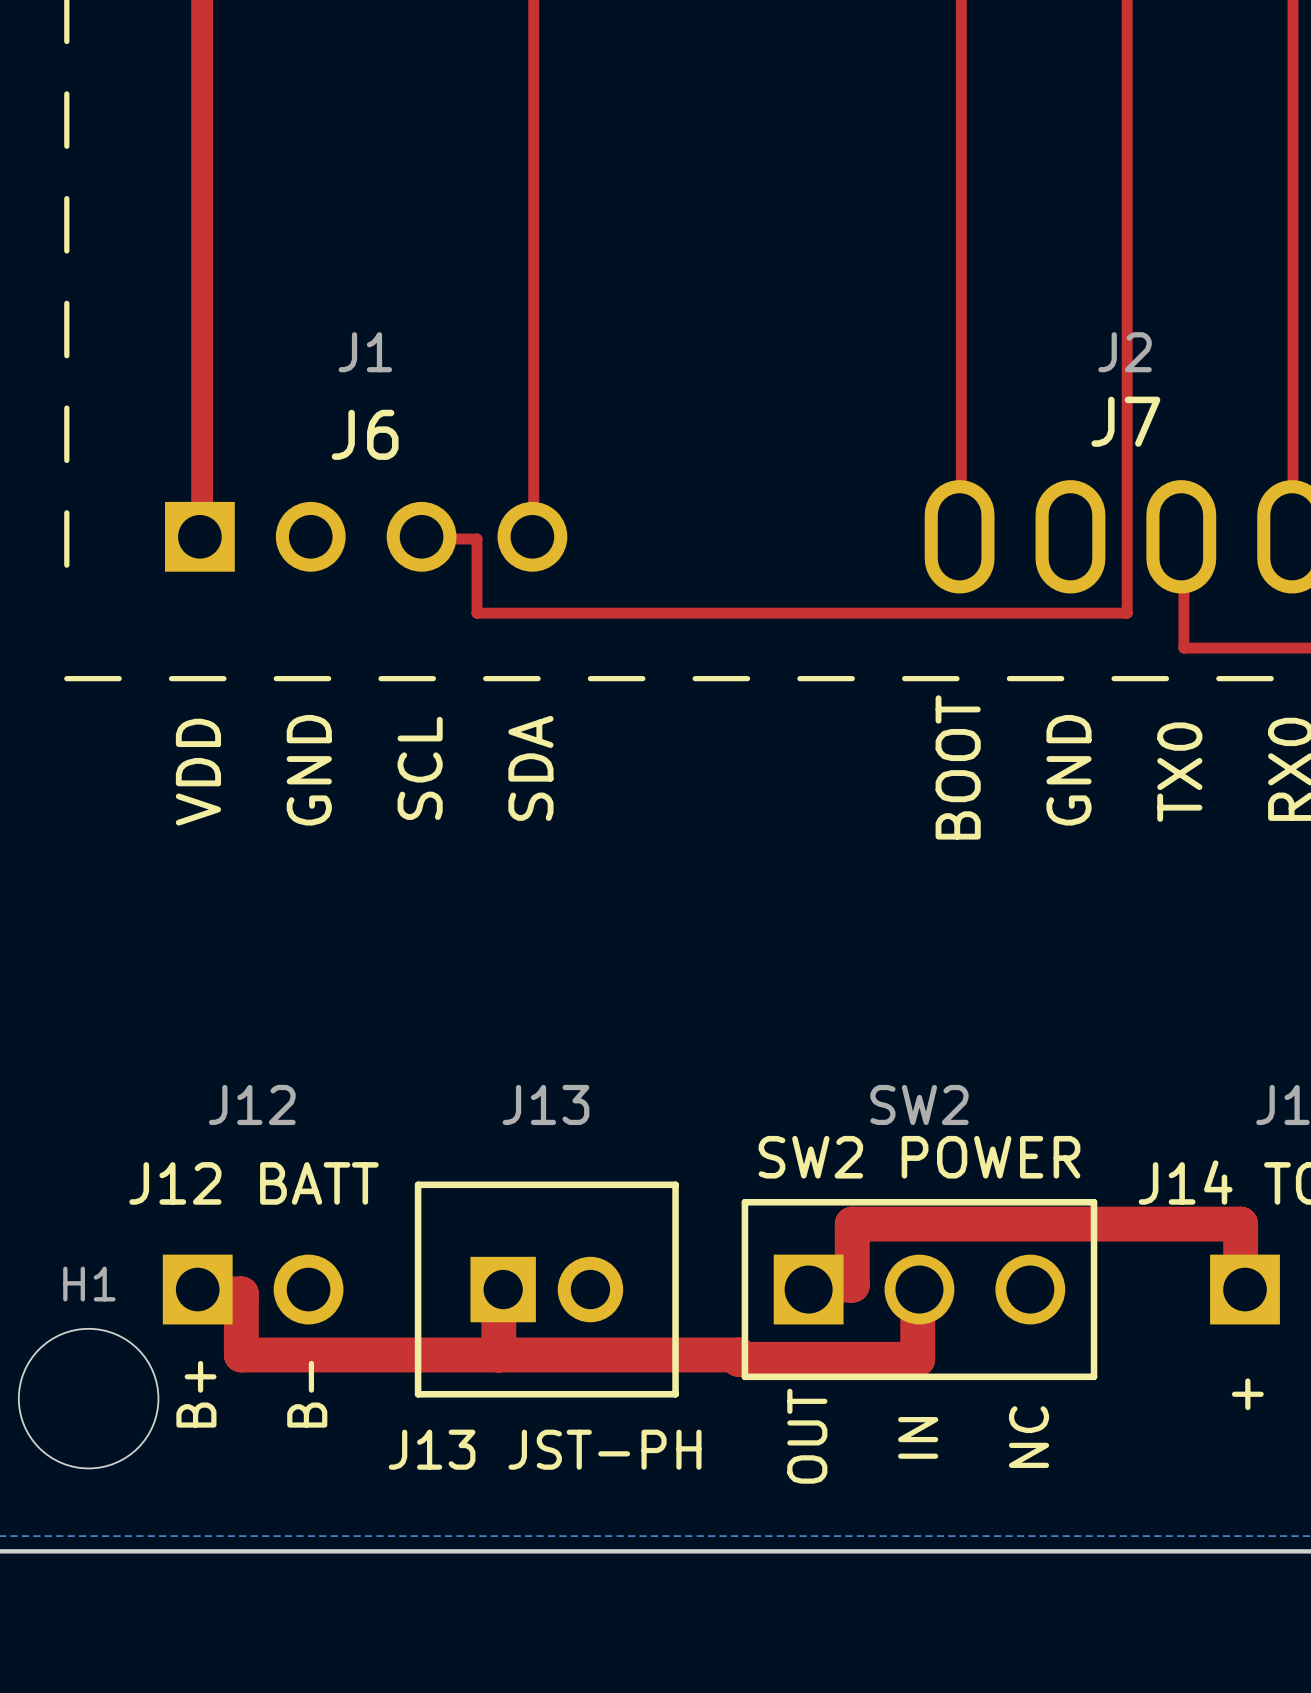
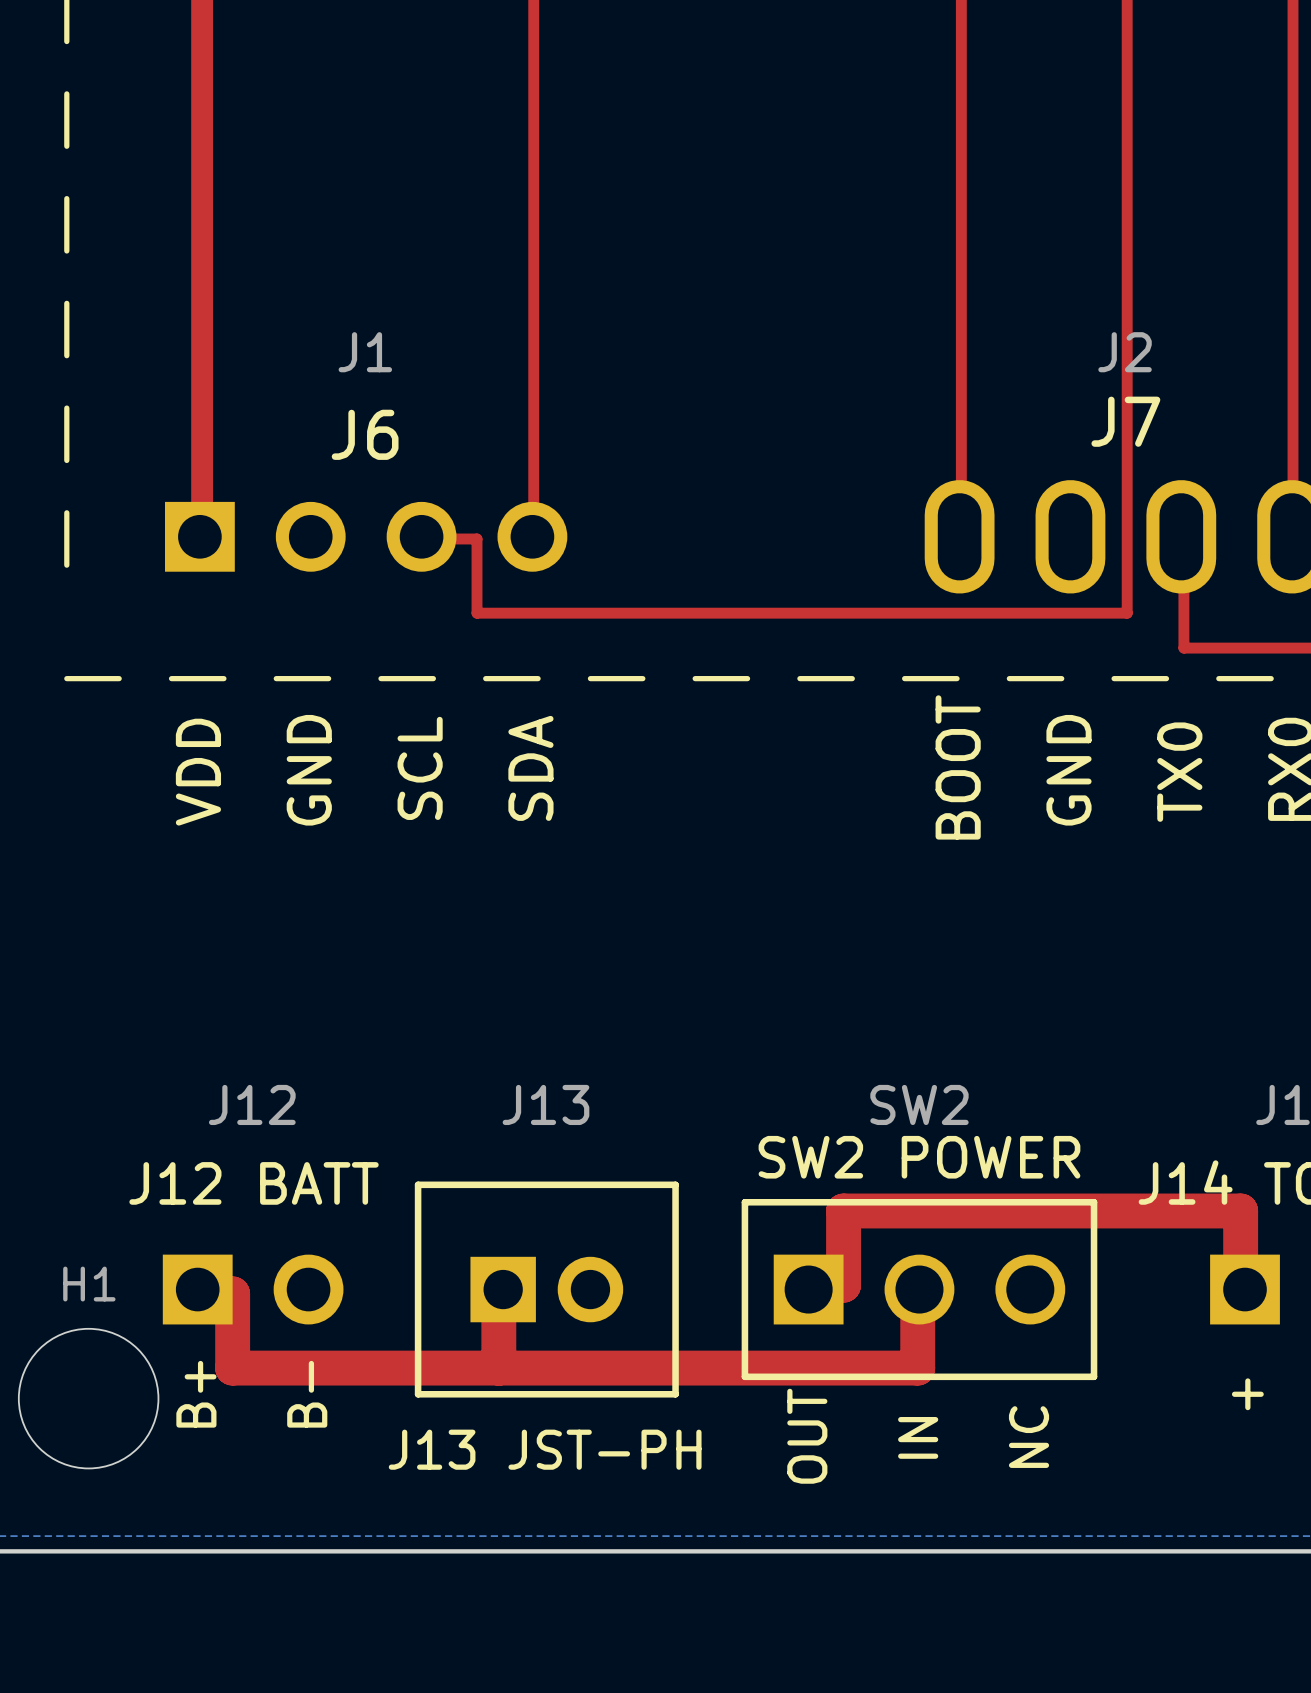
top track: (1240, 1224) (852, 1224) (852, 1285) (843, 1285) -> (1240, 1224) (1240, 1210) (843, 1210) (843, 1285)
top track: (232, 1293) (241, 1293) (241, 1354) (738, 1354) (738, 1359) (917, 1359) -> (232, 1293) (232, 1368) (917, 1368) (917, 1359)

